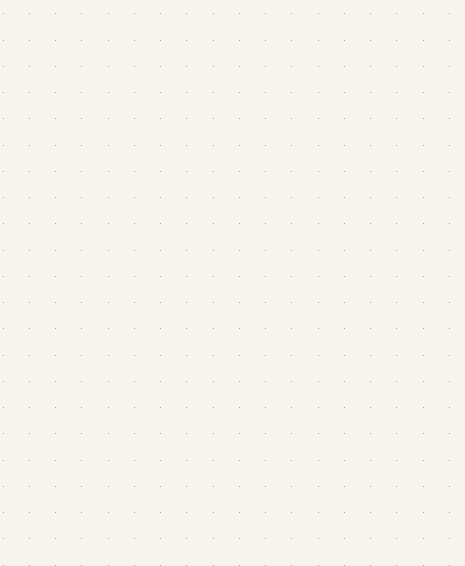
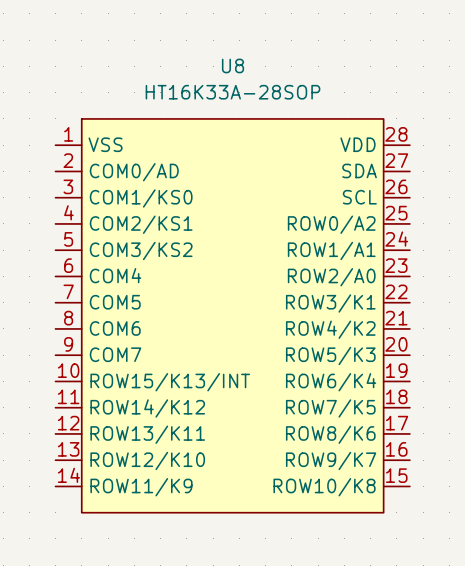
U8: none -> HT16K33A-28SOP (232, 315)

